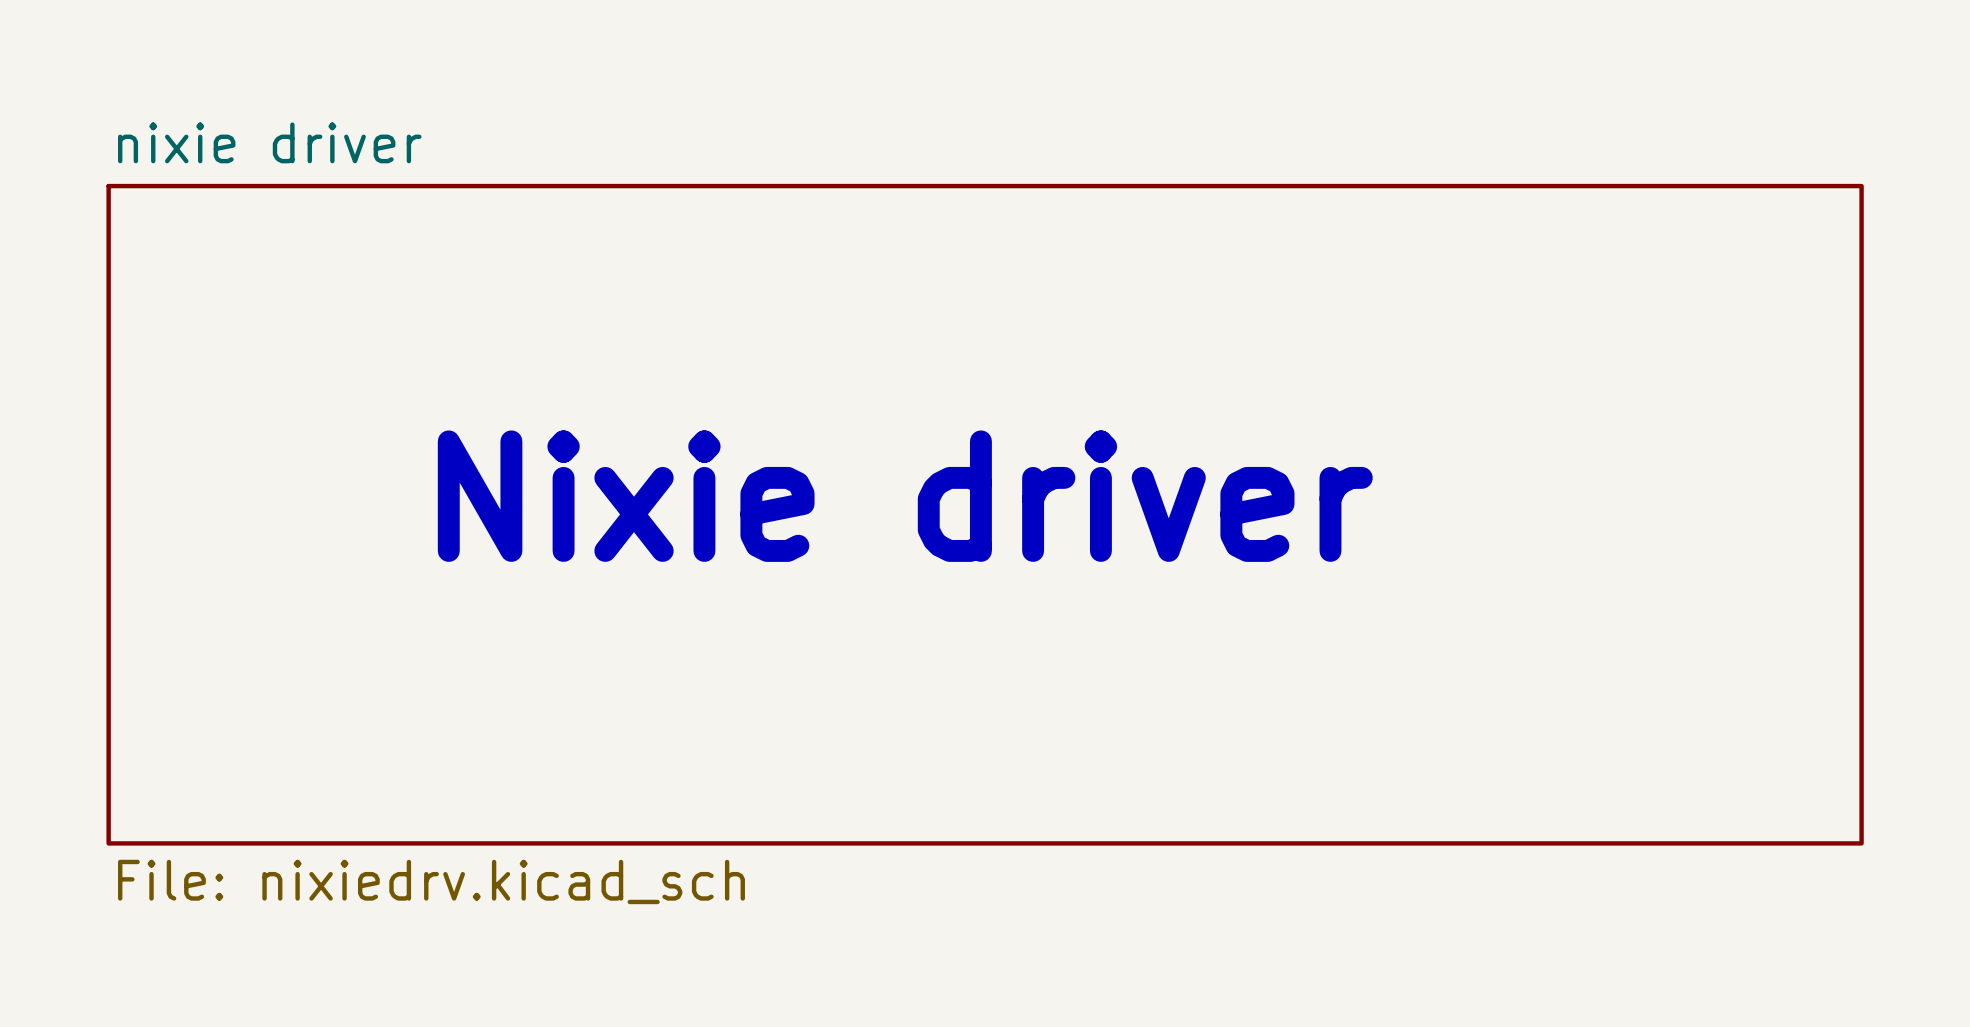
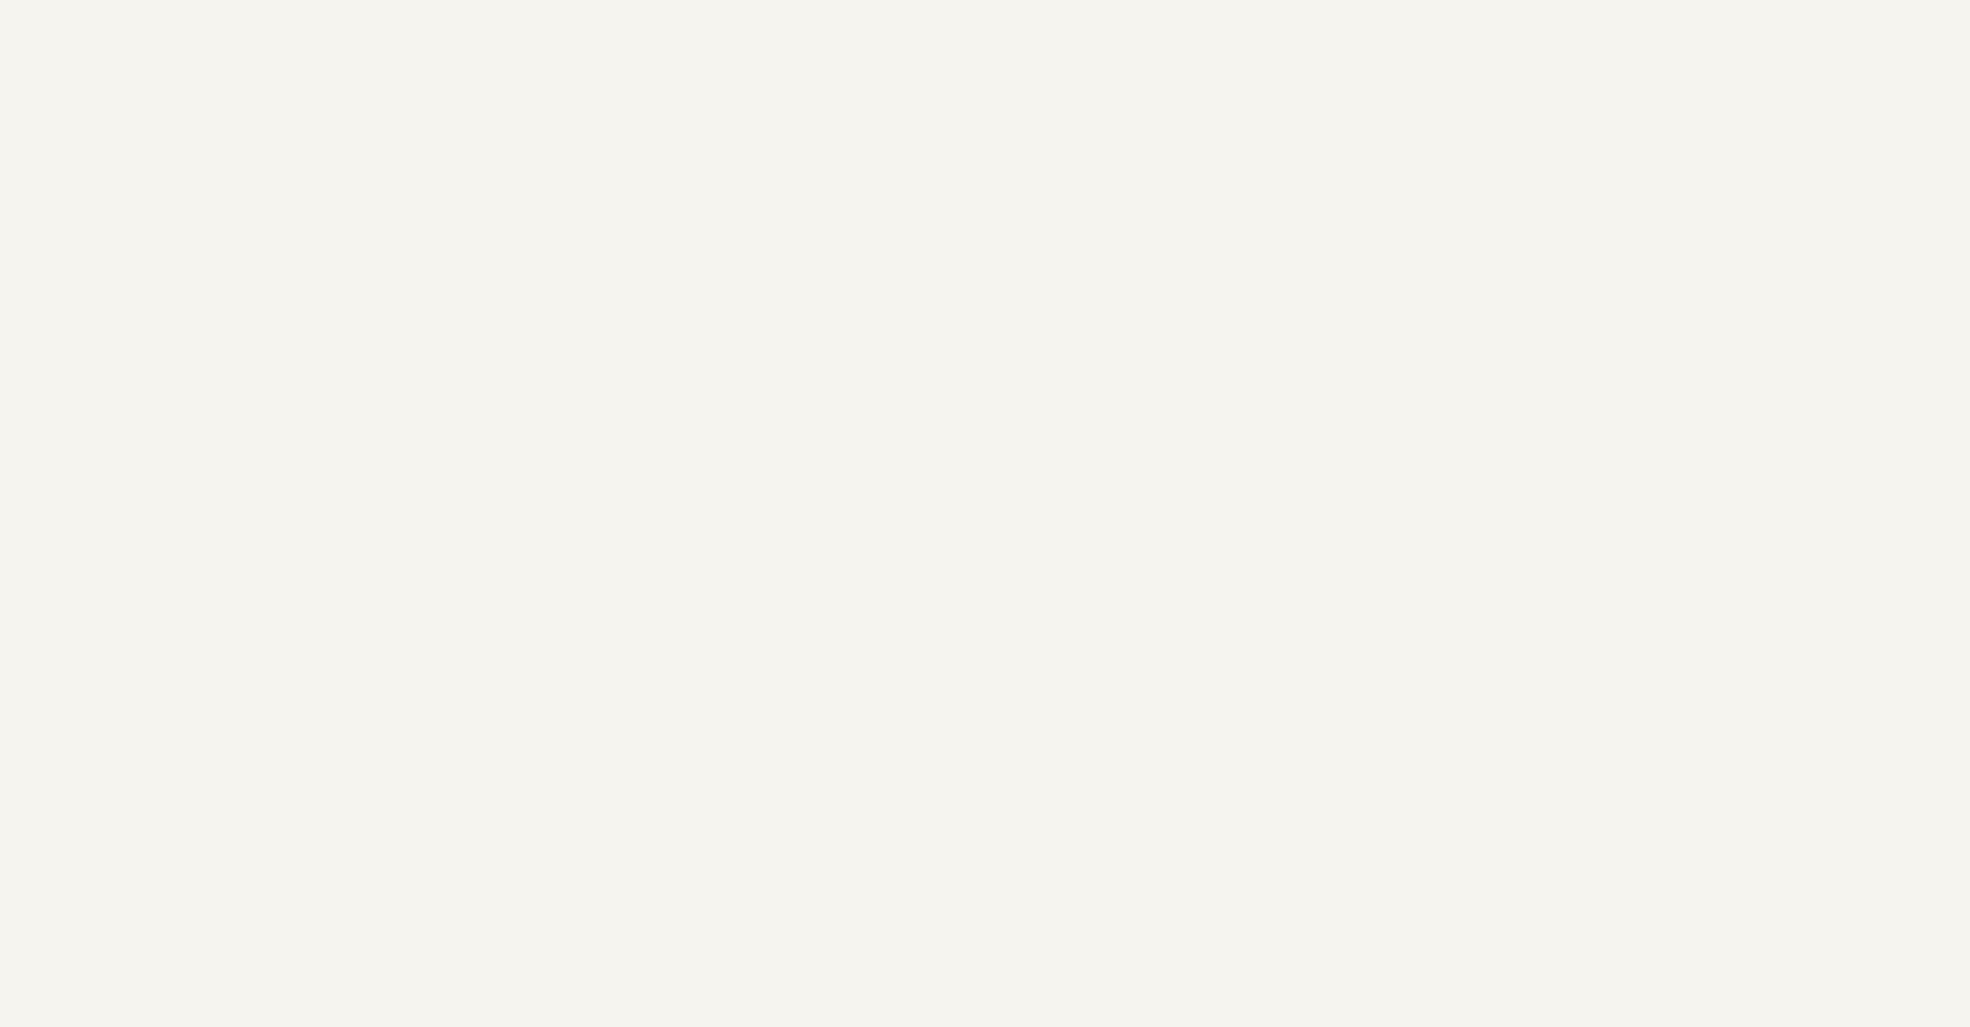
text: Nixie driver (905, 496) -> none
sheet nixie driver: File: nixiedrv.kicad_sch (985, 514) -> none

